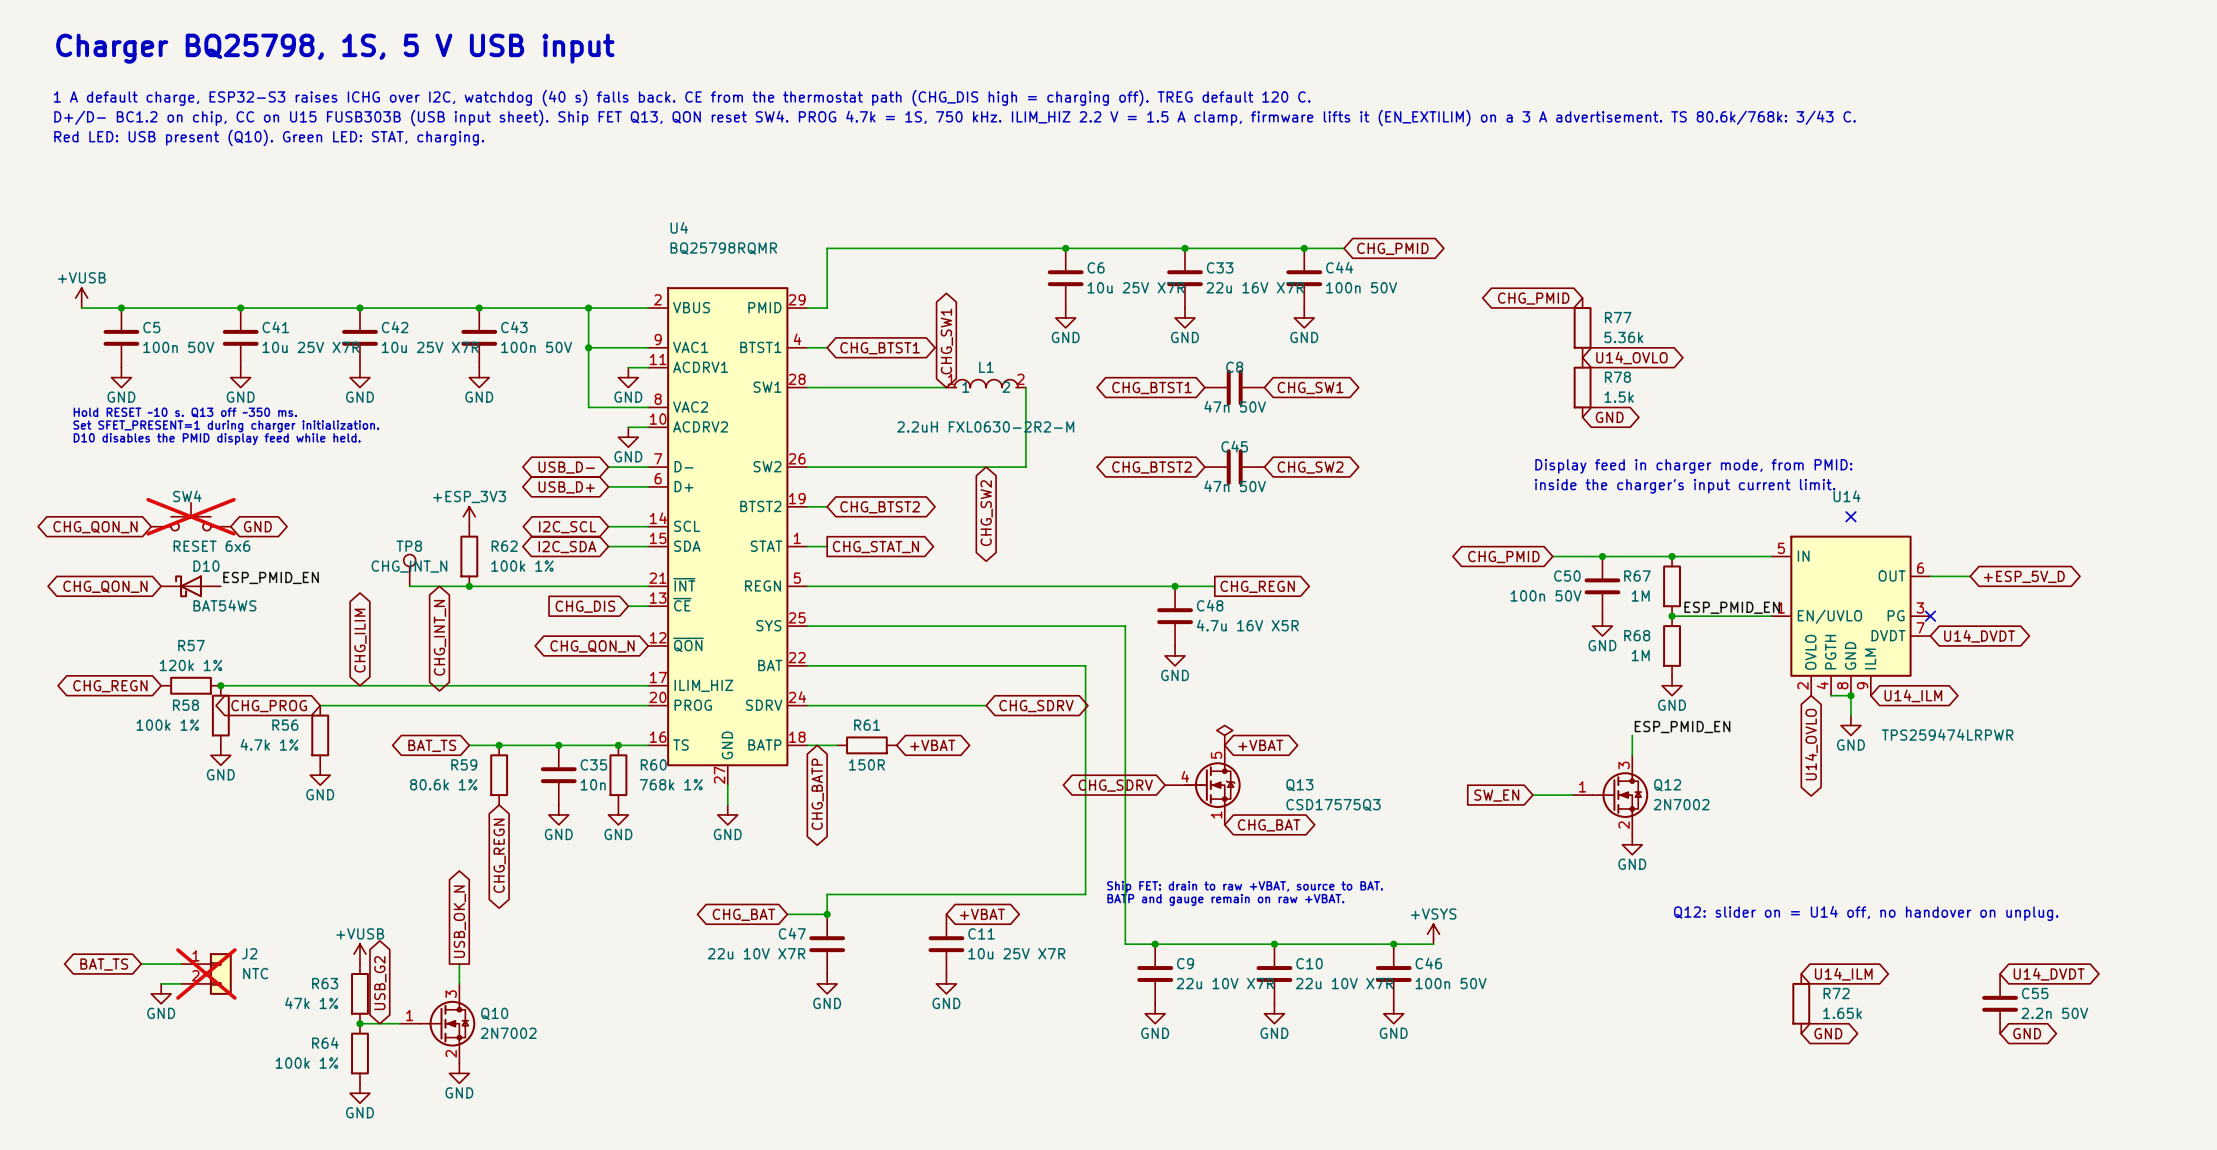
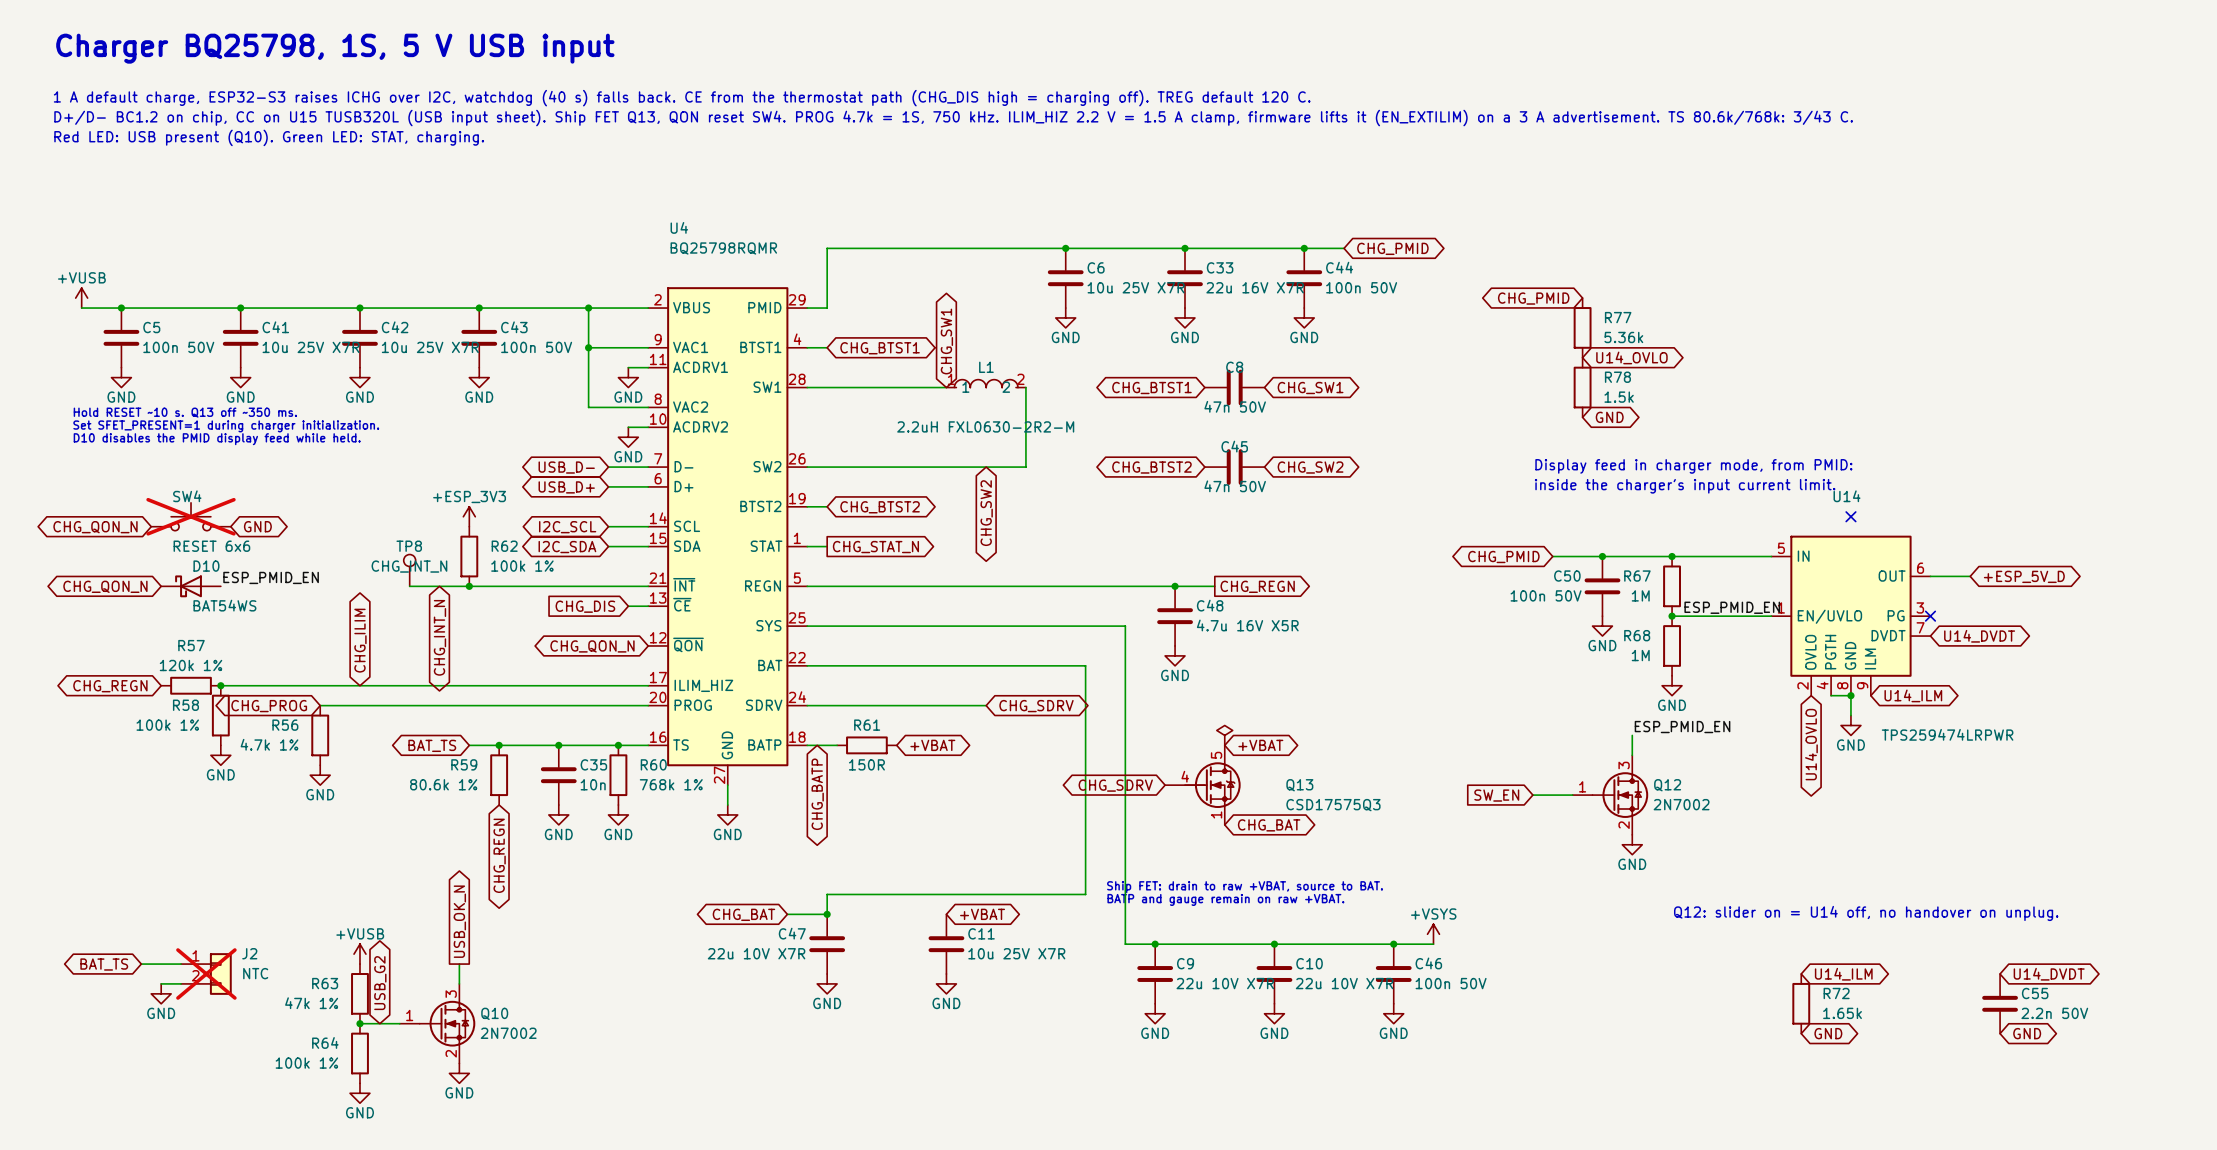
text: D+/D- BC1.2 on chip, CC on U15 FUSB303B (USB input sheet). Ship FET Q13, QON reset SW4. PROG 4.7k = 1S, 750 kHz. ILIM_HIZ 2.2 V = 1.5 A clamp, firmware lifts it (EN_EXTILIM) on a 3 A advertisement. TS 80.6k/768k: 3/43 C. (955, 118) -> D+/D- BC1.2 on chip, CC on U15 TUSB320L (USB input sheet). Ship FET Q13, QON reset SW4. PROG 4.7k = 1S, 750 kHz. ILIM_HIZ 2.2 V = 1.5 A clamp, firmware lifts it (EN_EXTILIM) on a 3 A advertisement. TS 80.6k/768k: 3/43 C. (953, 118)

